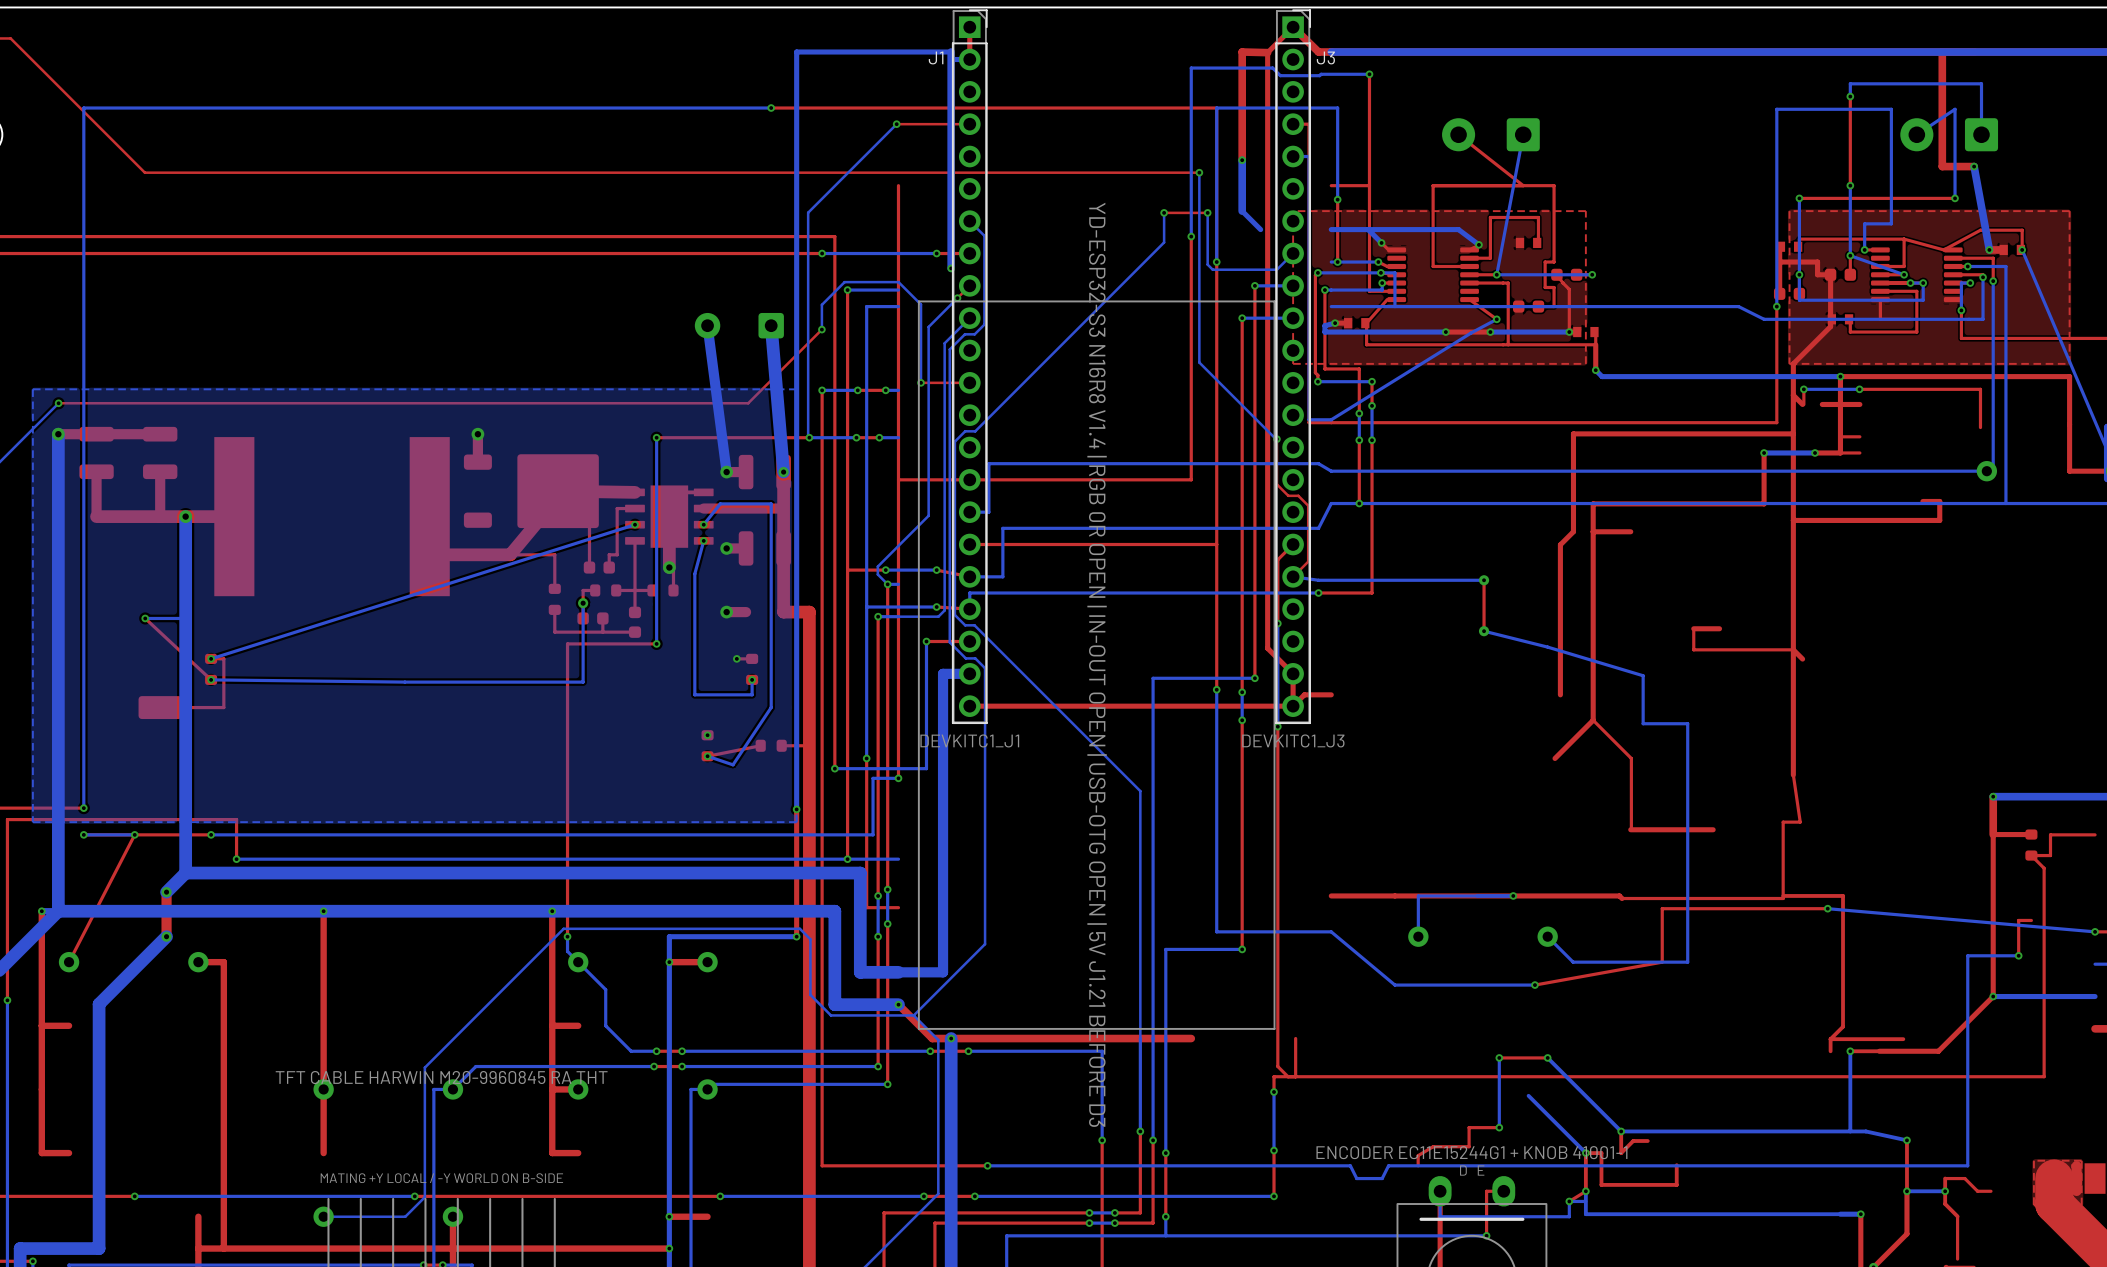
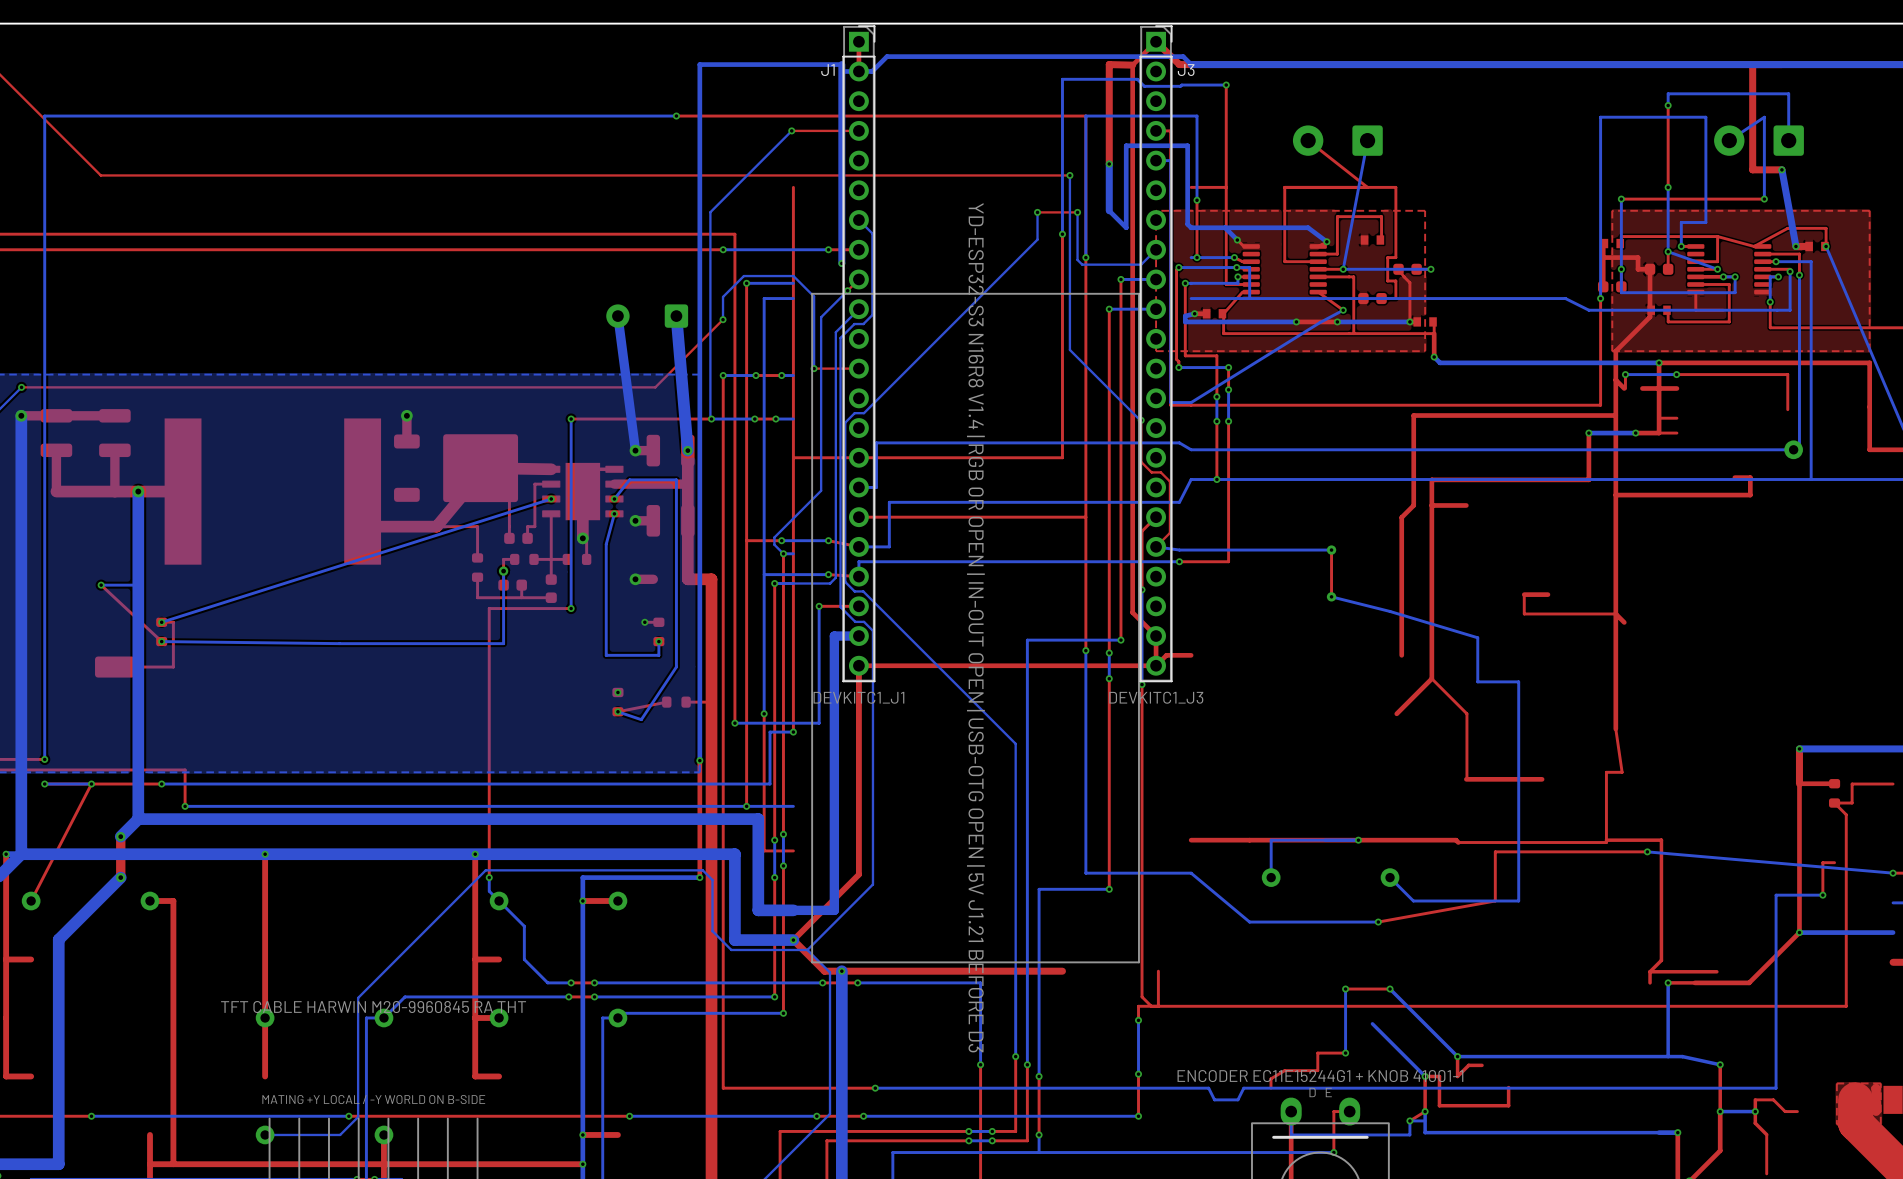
bottom track: none -> (1191, 64) (1183, 56) (887, 56) (872, 71) (858, 71)
bottom track: none -> (1191, 227) (1187, 224) (1187, 145) (1126, 145) (1126, 227)
top track: none -> (858, 665) (858, 874) (793, 940)

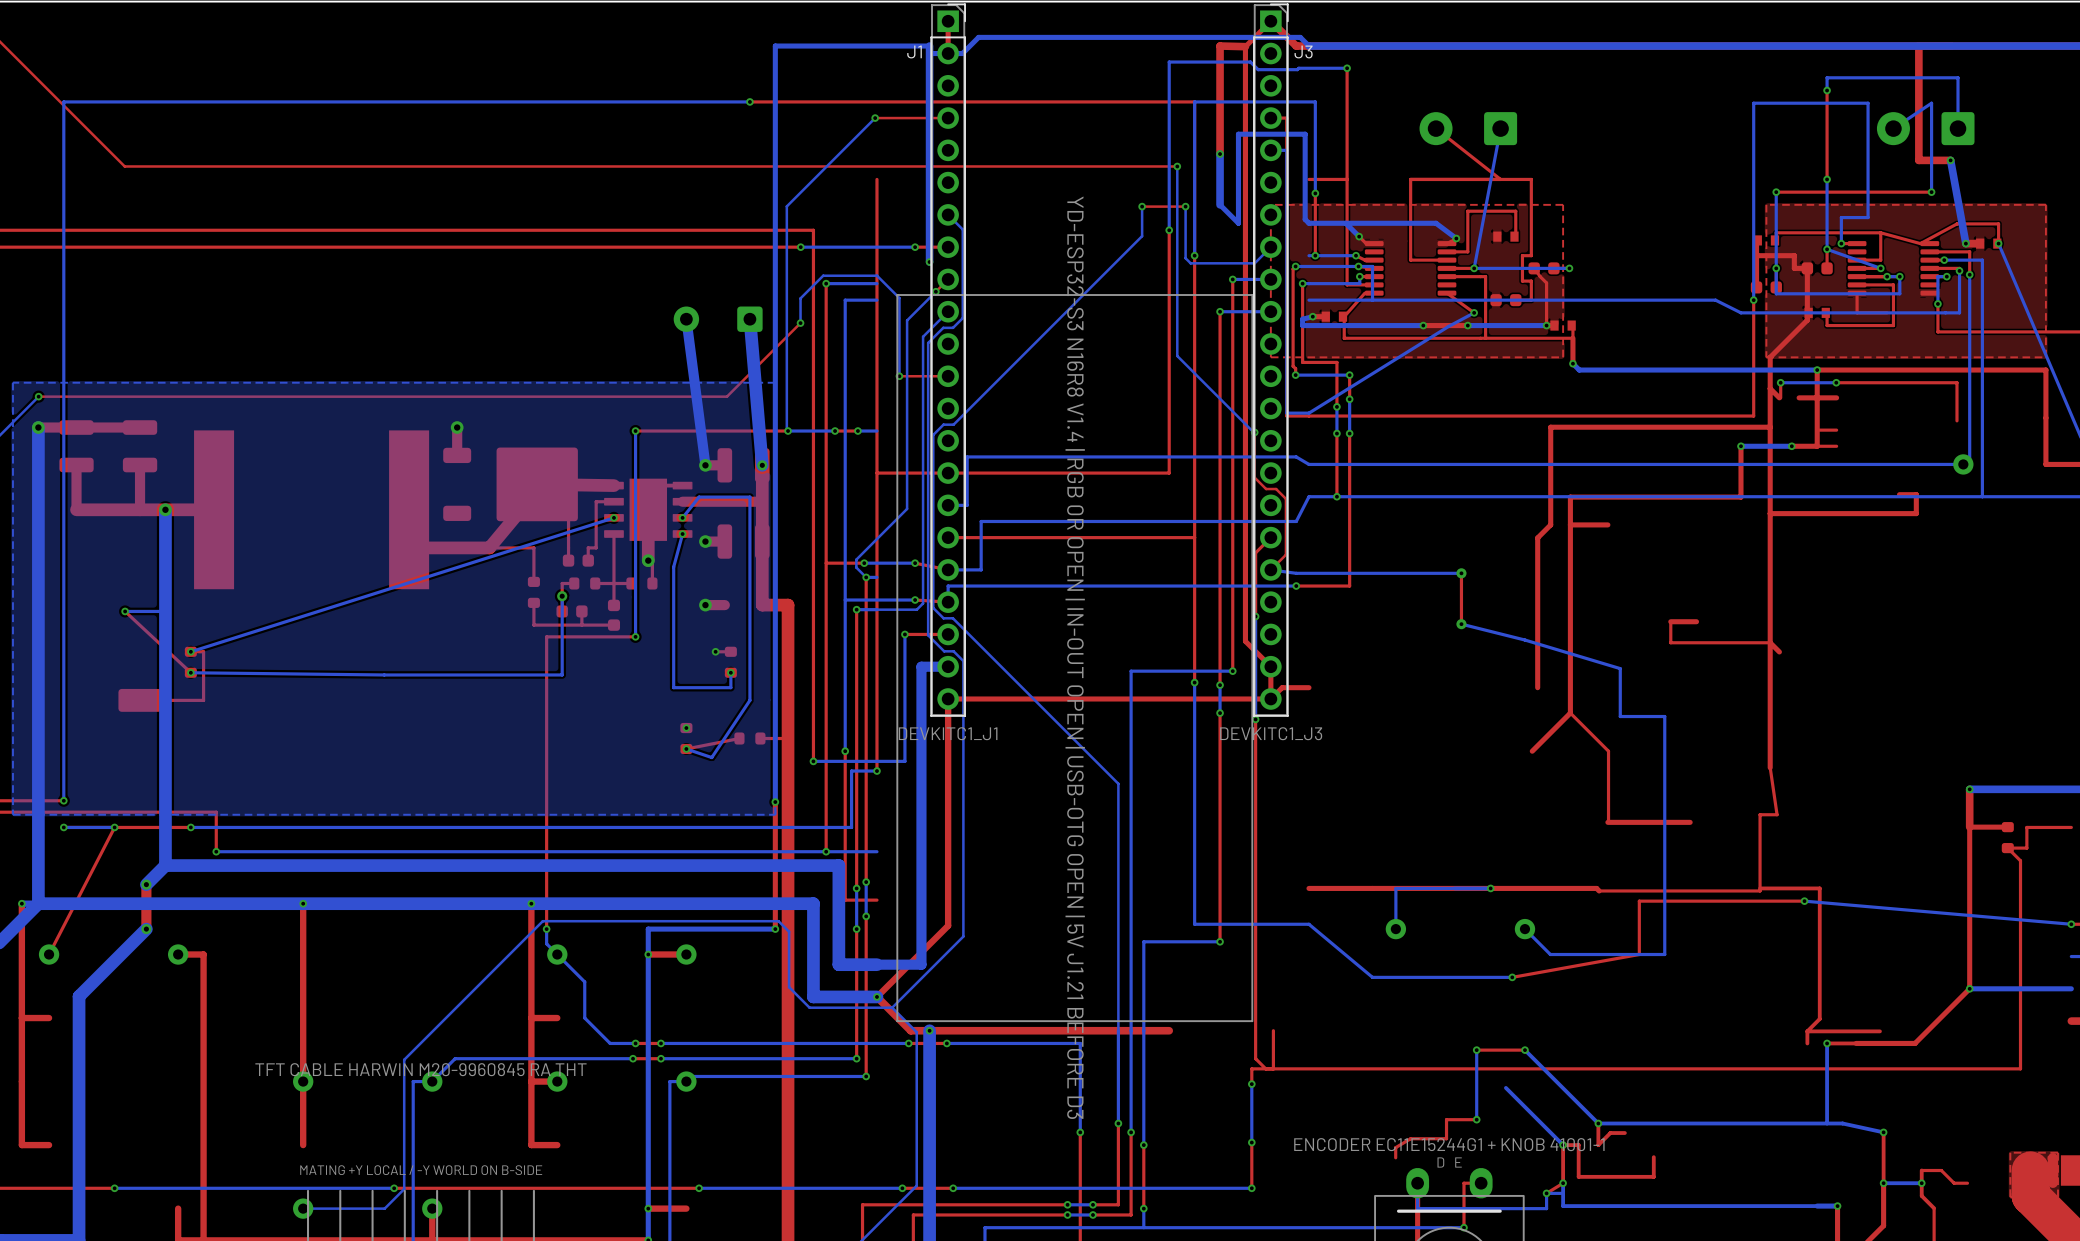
top track: (723, 375) (723, 1088) (875, 1088) -> none
via: (723, 375) -> none
bottom track: (755, 375) (723, 375) -> none
via: (755, 375) -> none
top track: (781, 375) (755, 375) -> none
via: (781, 375) -> none
bottom track: (793, 375) (781, 375) -> none
top track: (1834, 862) (1822, 862) (1822, 895) -> none
bottom track: (1822, 895) (1776, 895) (1776, 1088) (1243, 1088) (1237, 1099) (1214, 1099) (1208, 1088) (875, 1088) -> none
via: (1822, 895) -> none
via: (875, 1088) -> none

